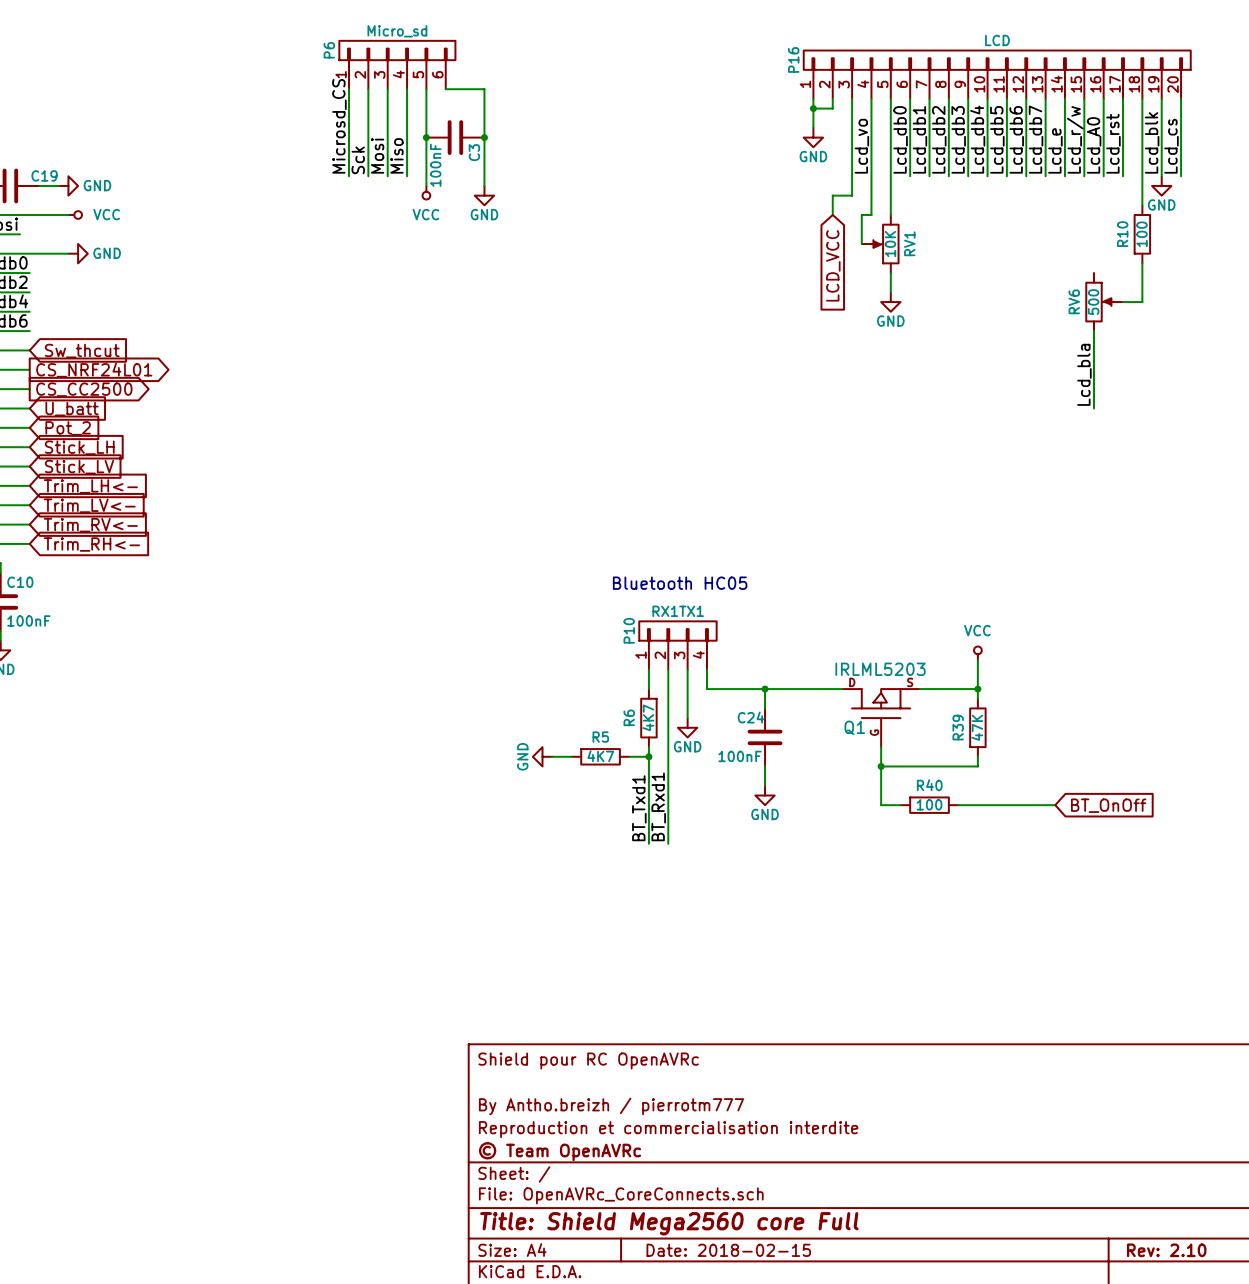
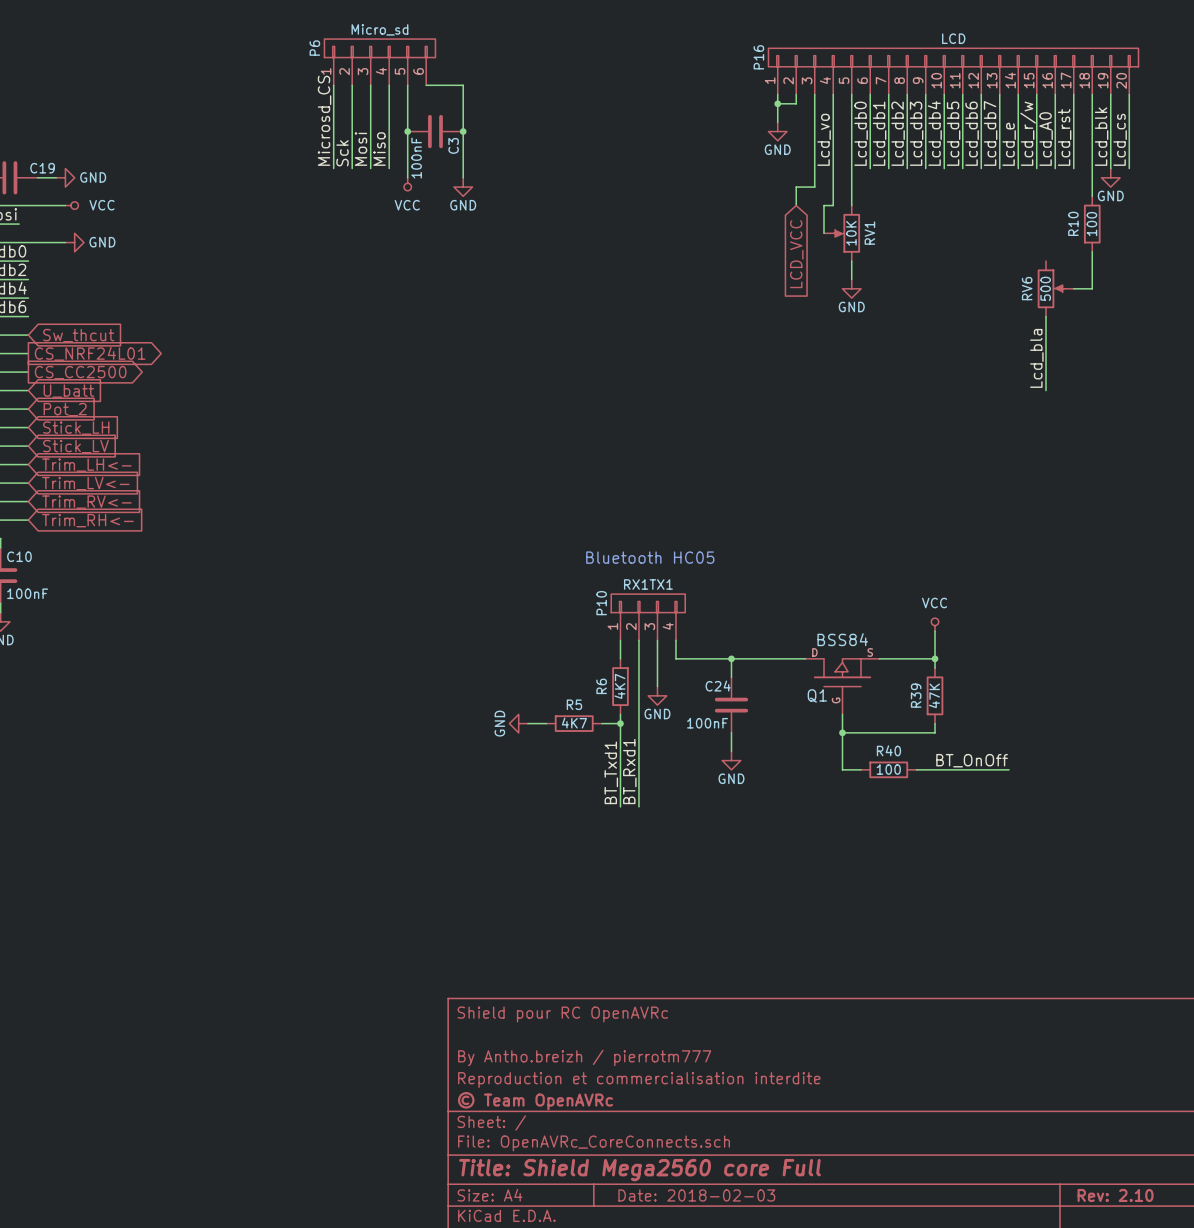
Q1 value: IRLML5203 (880, 669) -> BSS84 (842, 639)
label: none -> BT_OnOff (972, 760)
global label: BT_OnOff (1108, 805) -> none
title block: Date: 2018-02-15 (728, 1250) -> Date: 2018-02-03 (696, 1195)

